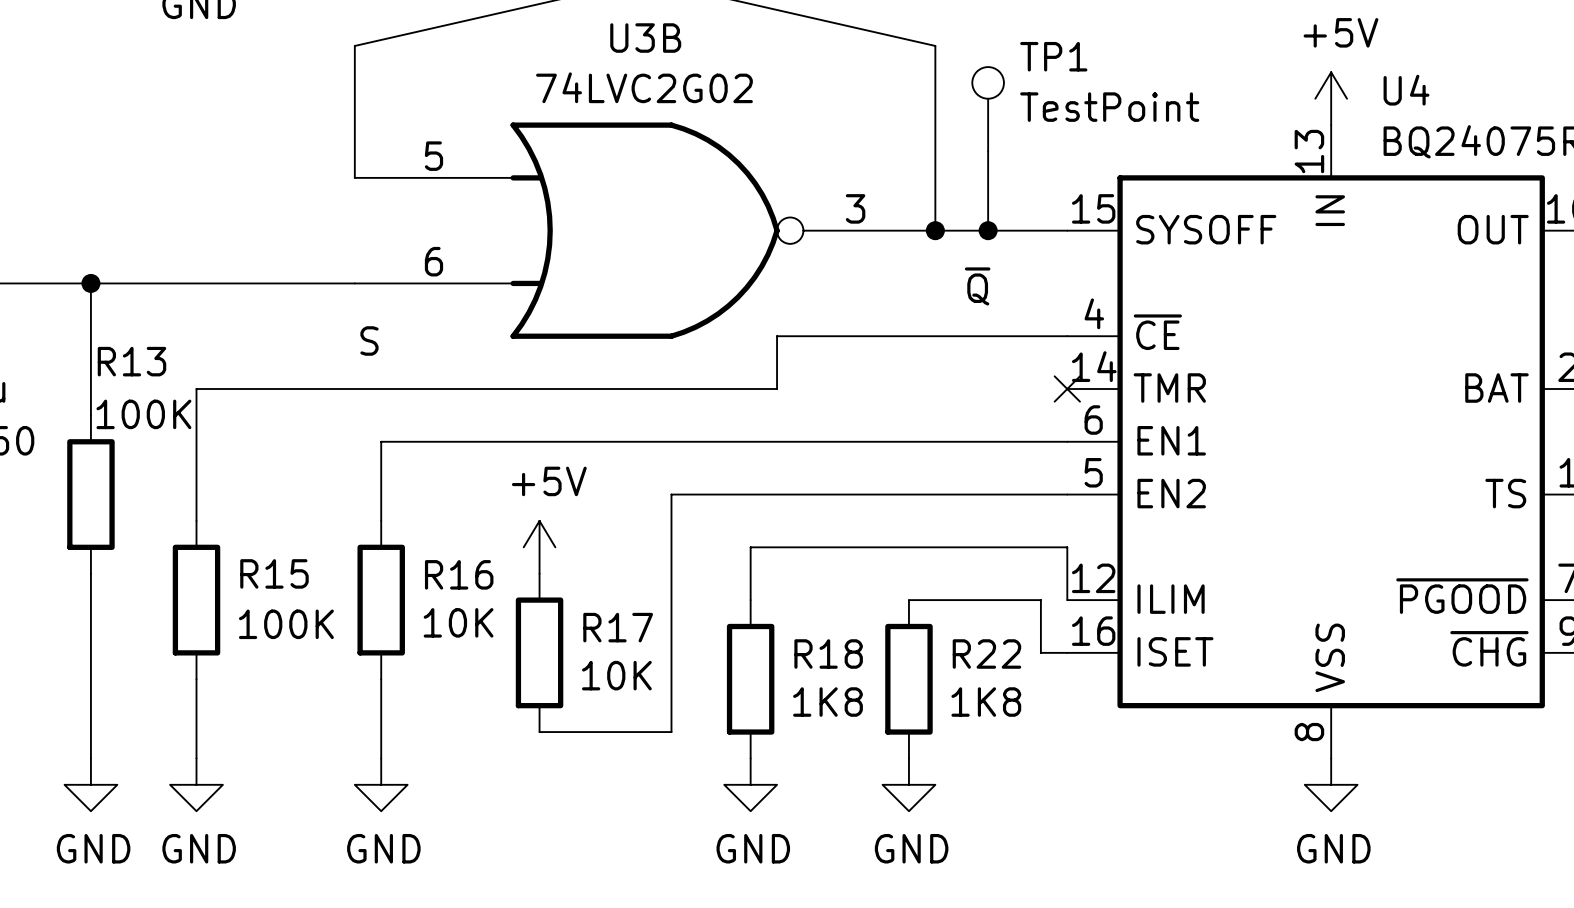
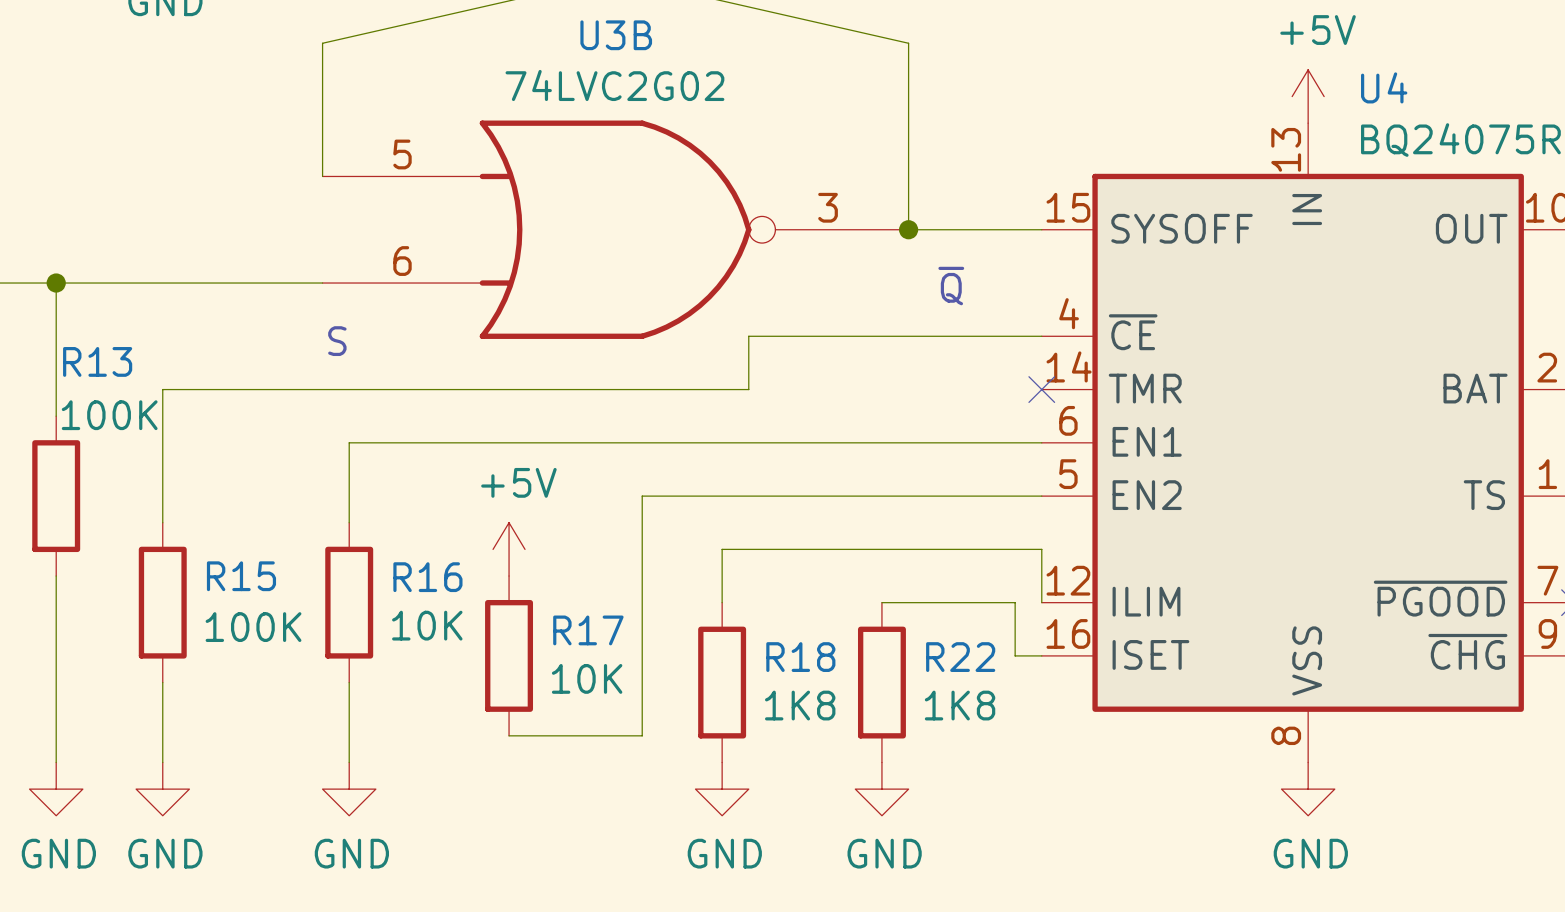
TP1: TestPoint (988, 109) -> none
wire: (988, 151) (988, 230) -> none
junction: (988, 230) -> none

